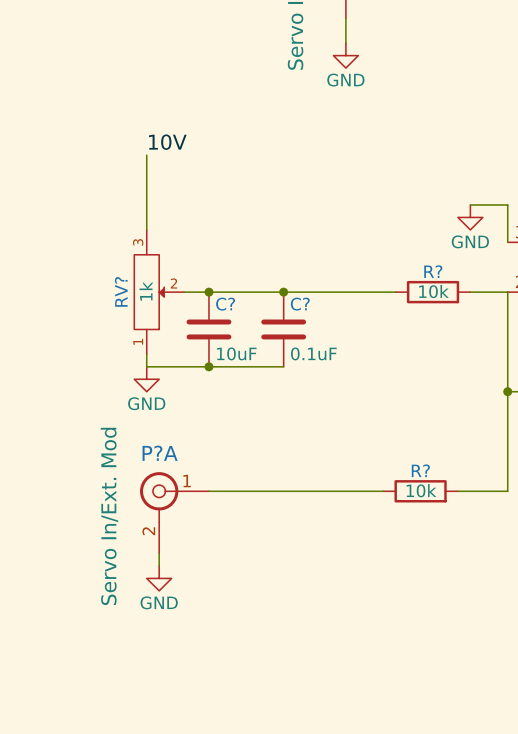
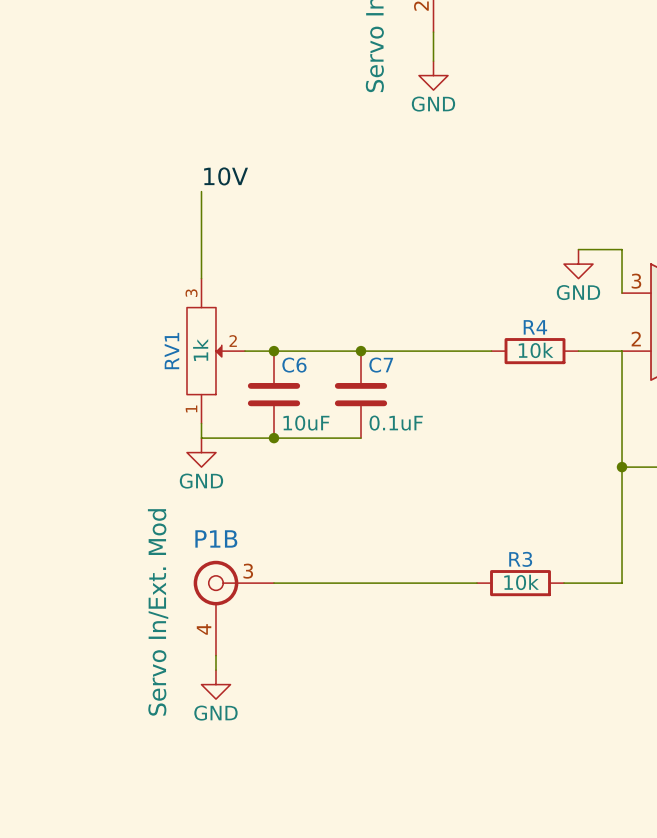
R? name: R? (433, 271) -> R4 (535, 327)
RV? name: RV? (121, 291) -> RV1 (171, 351)
C? name: C? (225, 304) -> C6 (294, 365)
C? name: C? (300, 304) -> C7 (381, 365)
P?A name: P?A (160, 453) -> P1B (216, 538)
R? name: R? (420, 470) -> R3 (520, 559)
P?A pin number: 1 (187, 481) -> 3 (248, 571)
P?A pin number: 2 (148, 531) -> 4 (204, 629)

